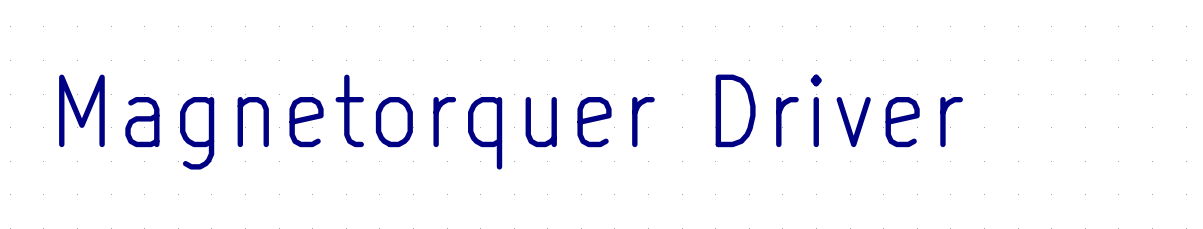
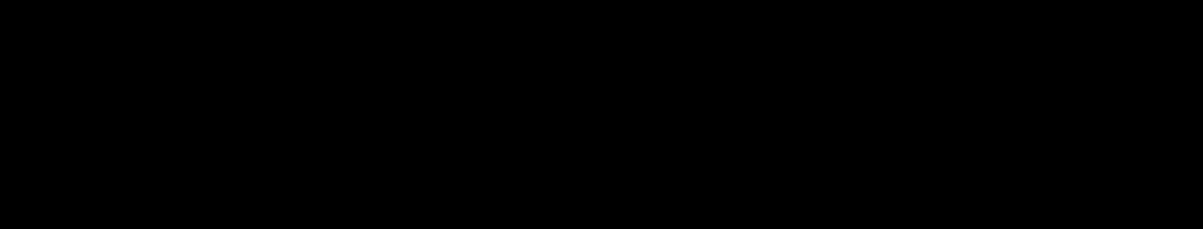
text: Magnetorquer Driver (511, 122) -> none

